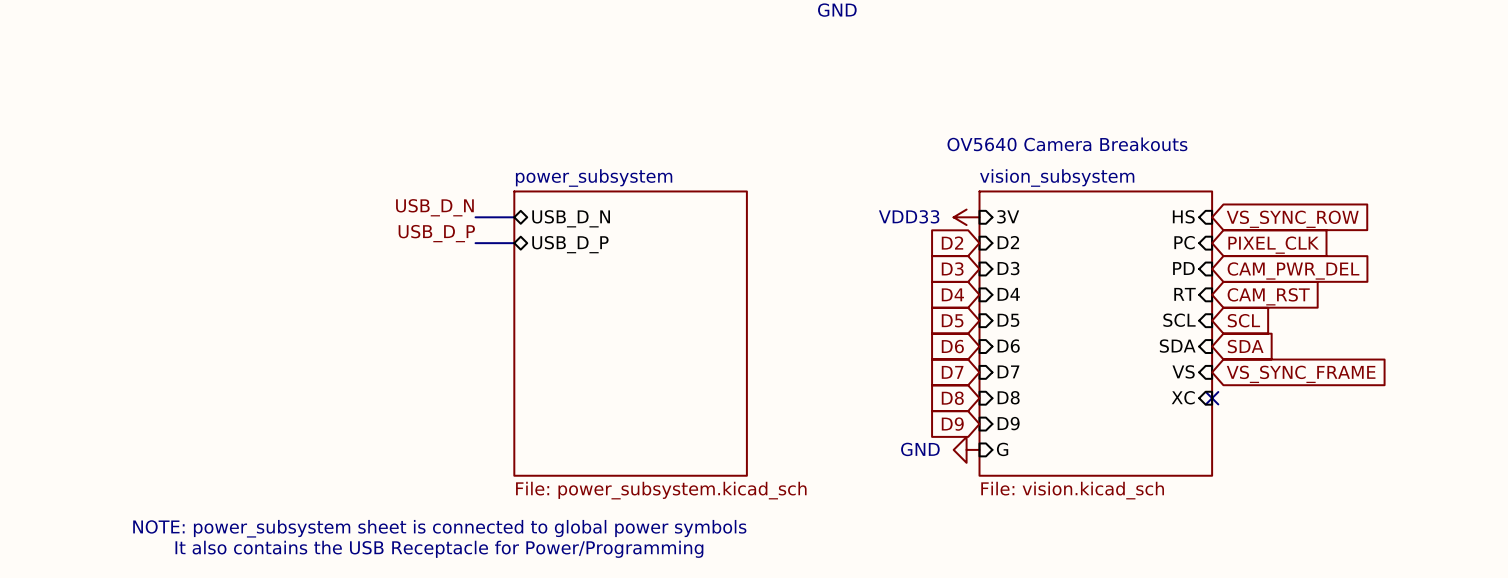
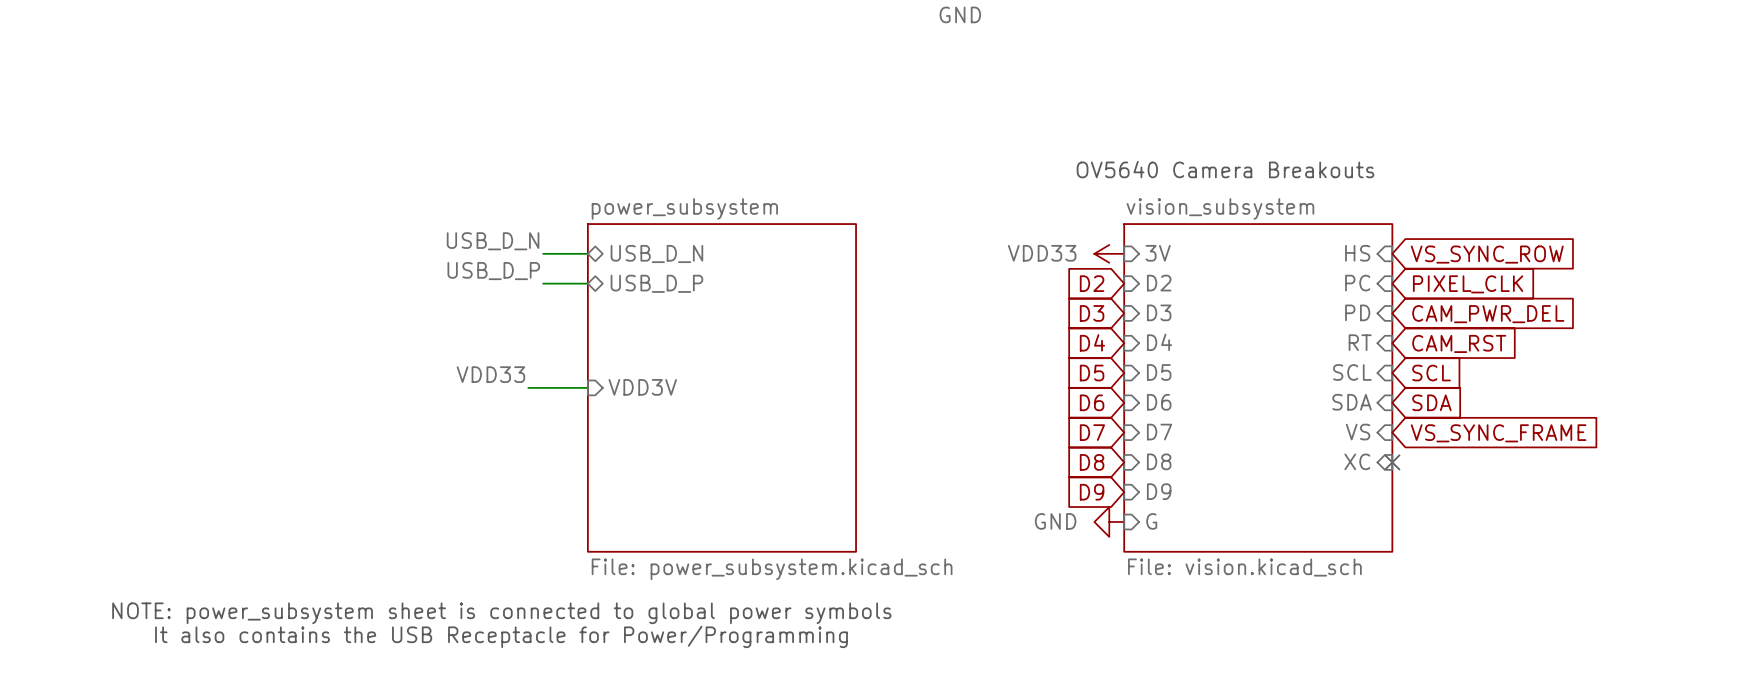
label: none -> VDD33 (490, 374)
wire: none -> (528, 387) (587, 387)
sheet pin: none -> VDD3V (642, 387)

